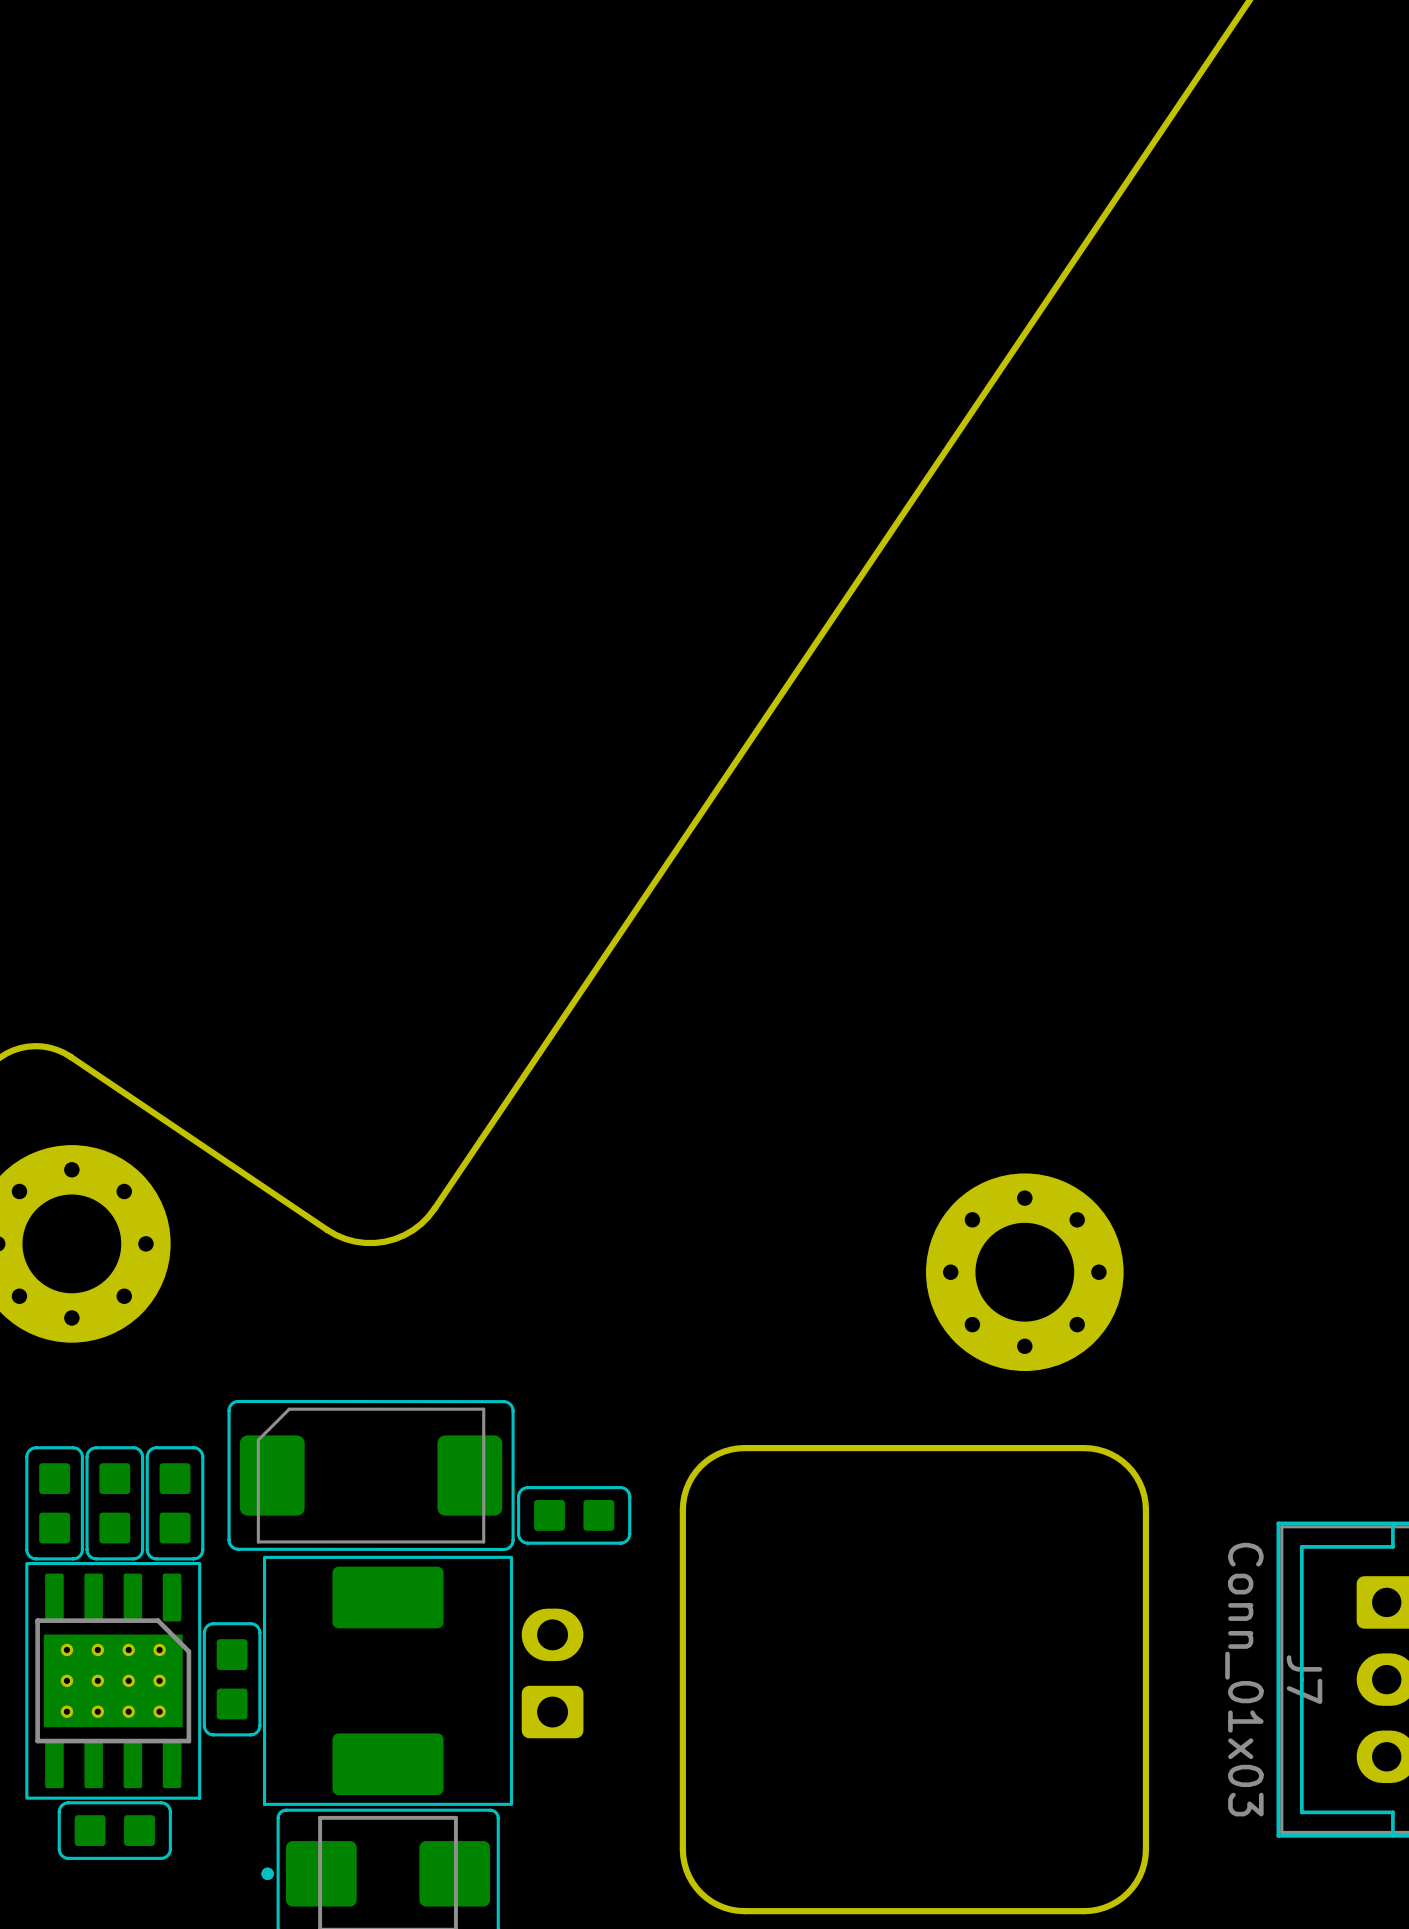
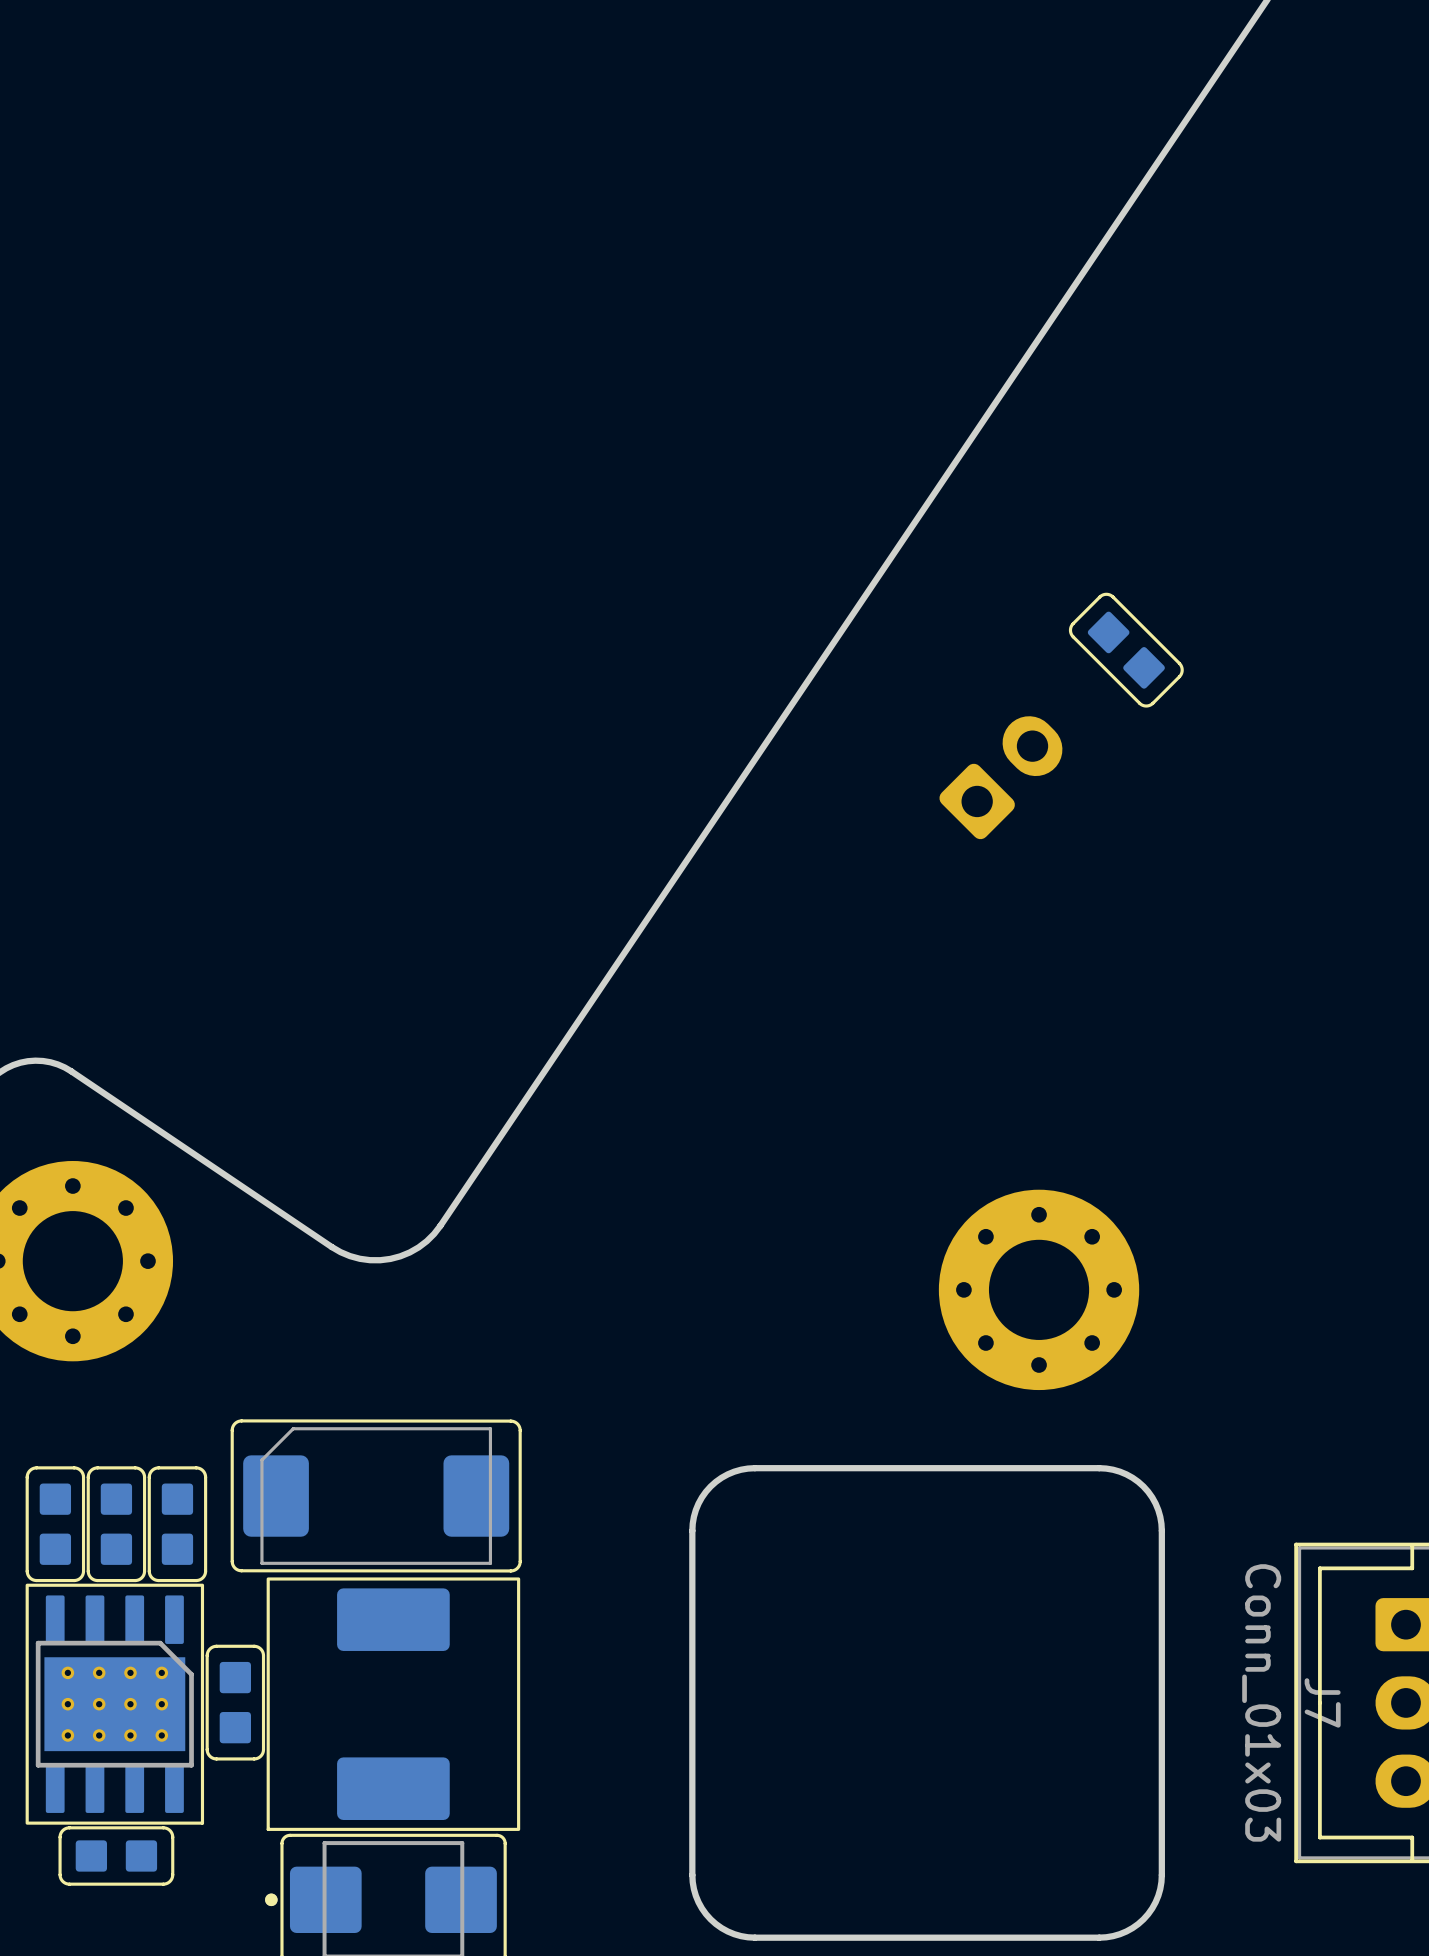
part: none -> (1126, 650)
part: none -> (1000, 777)
part: (574, 1515) -> none
part: (552, 1673) -> none

